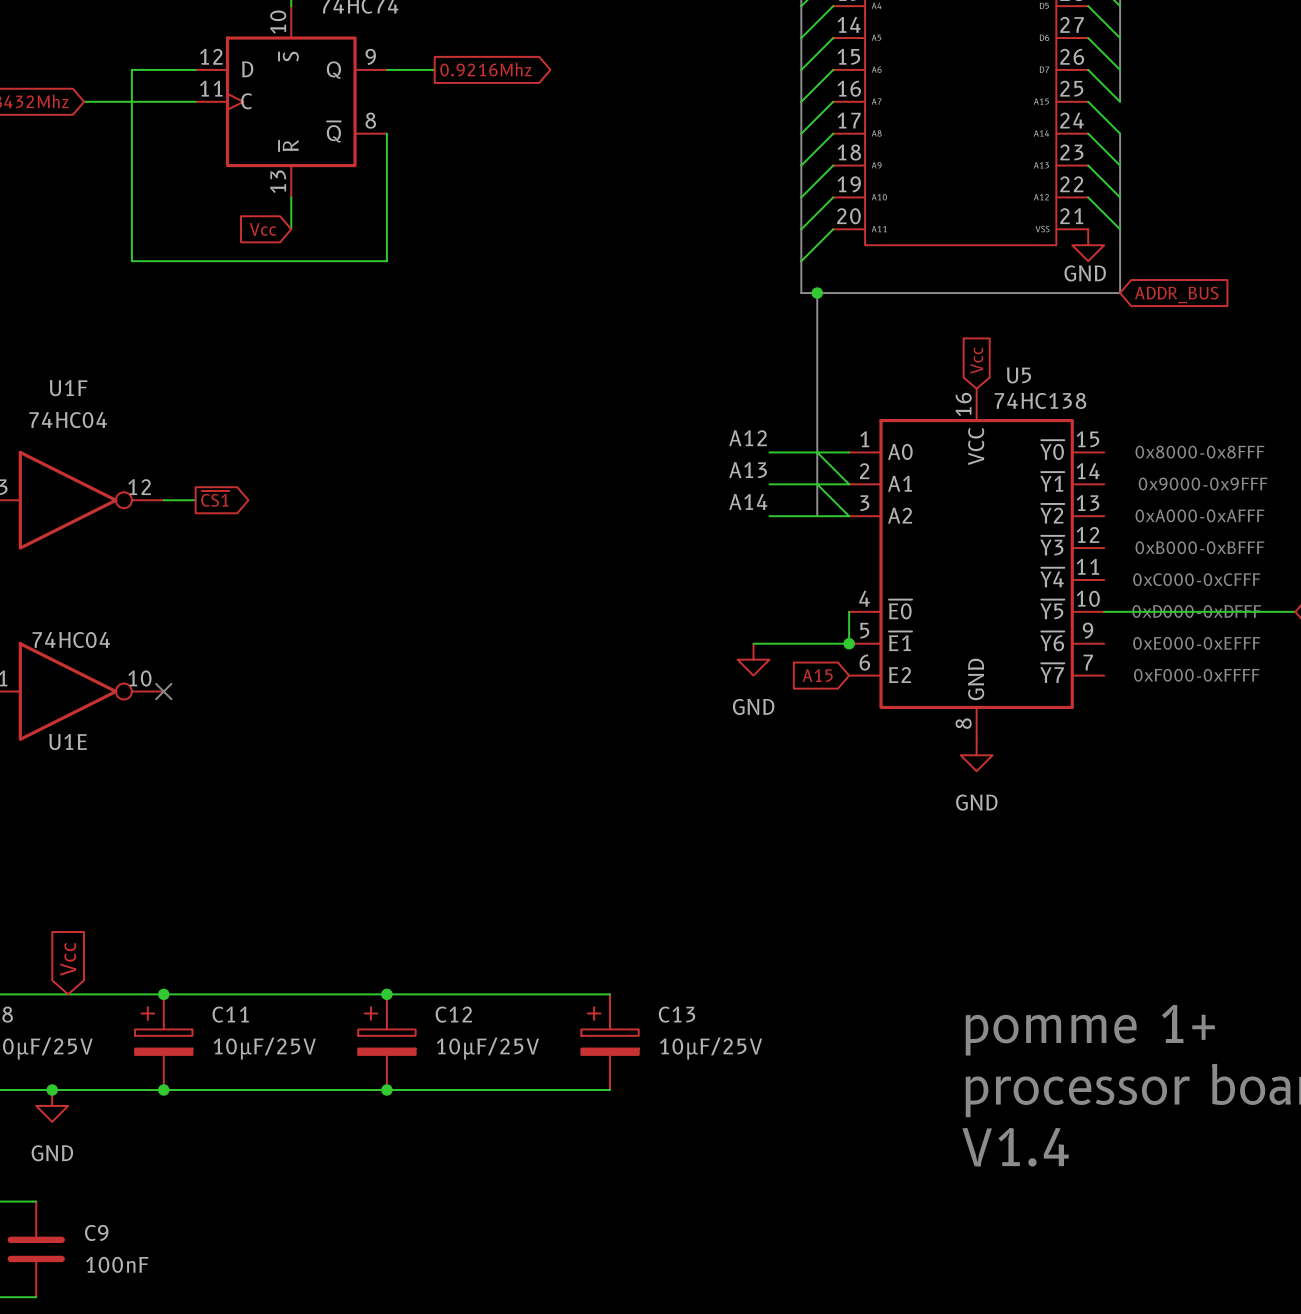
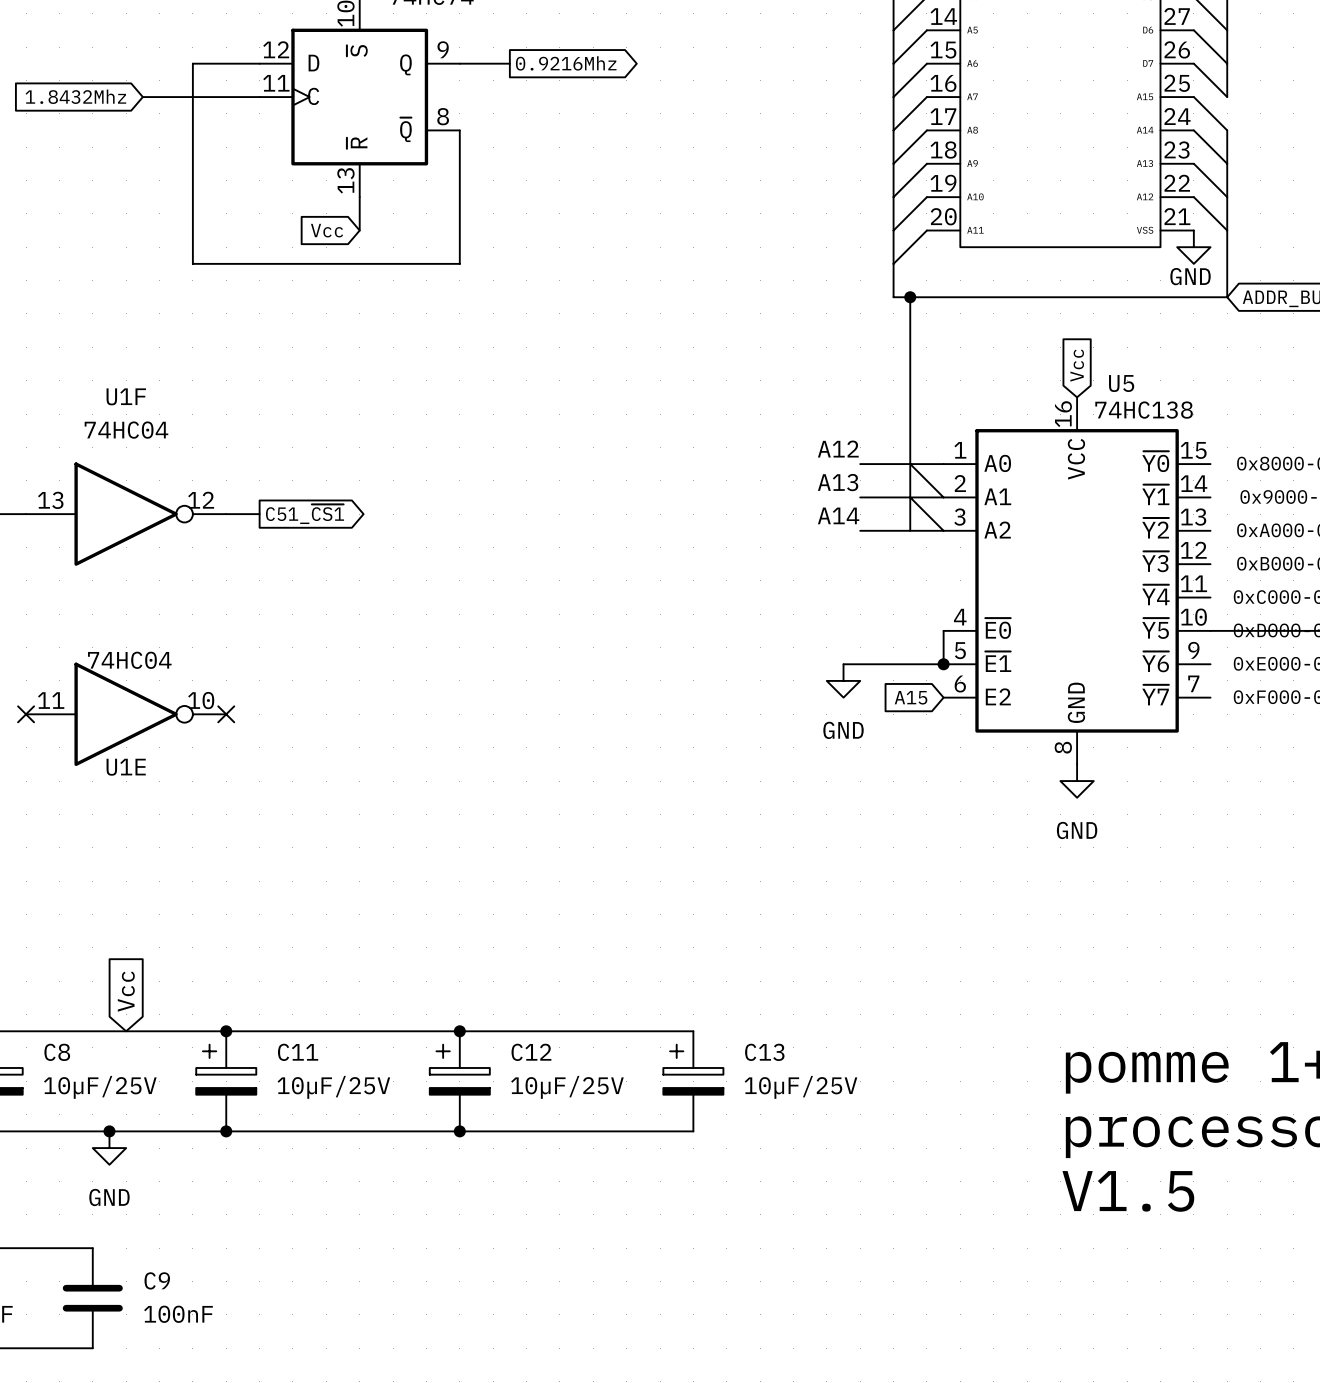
global label: ~{CS1} (215, 498) -> C51_~{CS1} (305, 514)
text: V1.4 (1015, 1147) -> V1.5 (1128, 1191)

